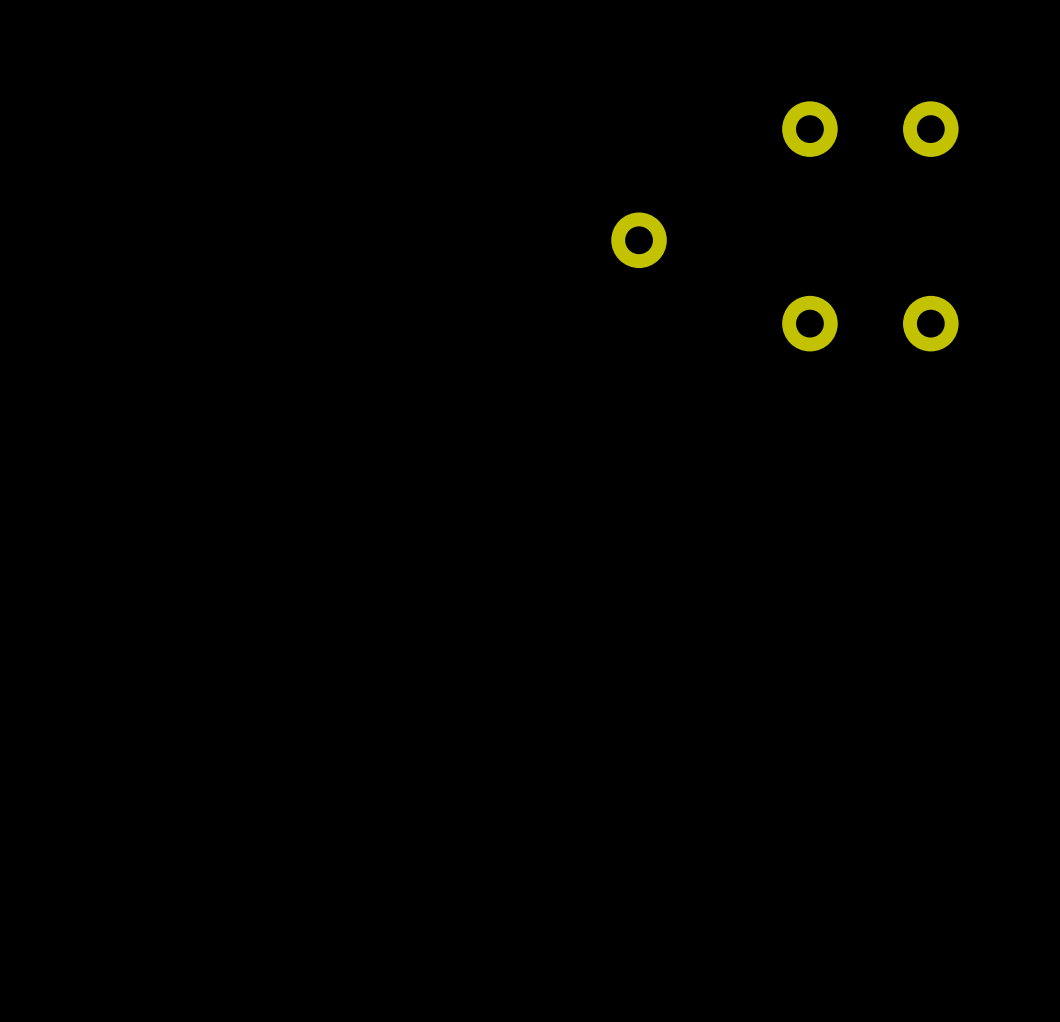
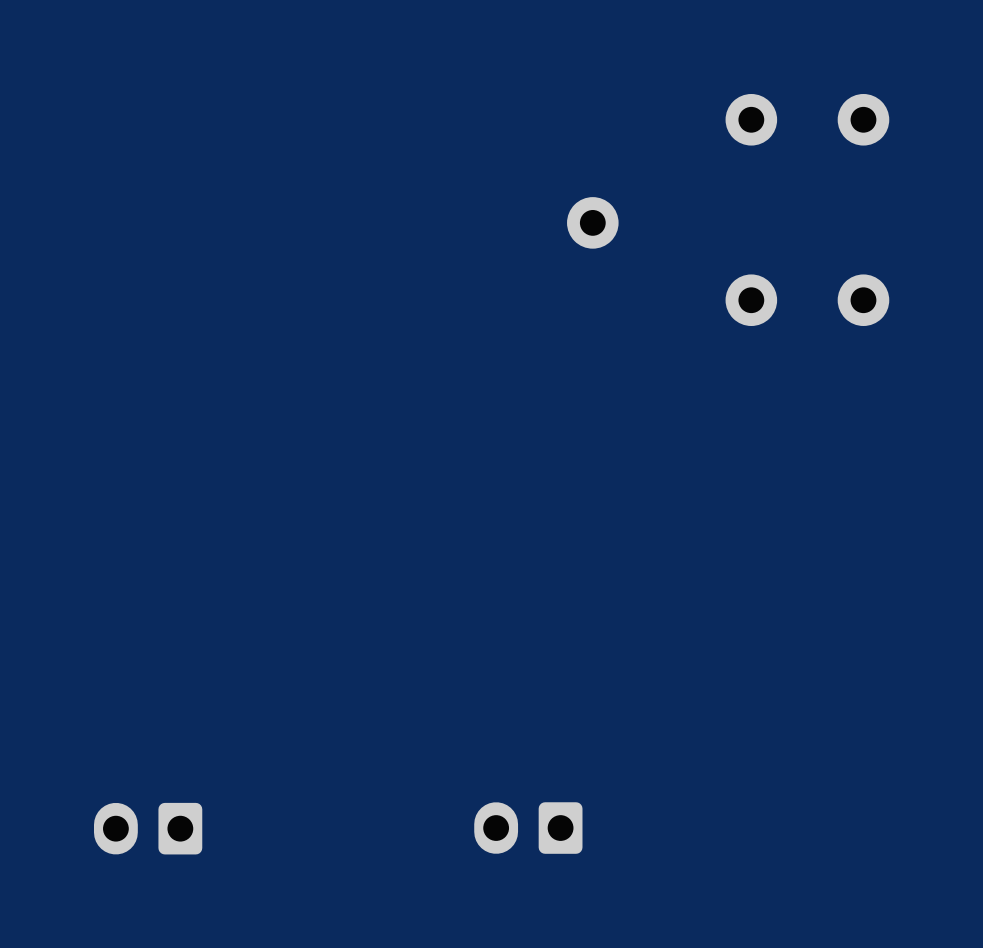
part: none -> (528, 828)
part: none -> (148, 828)

